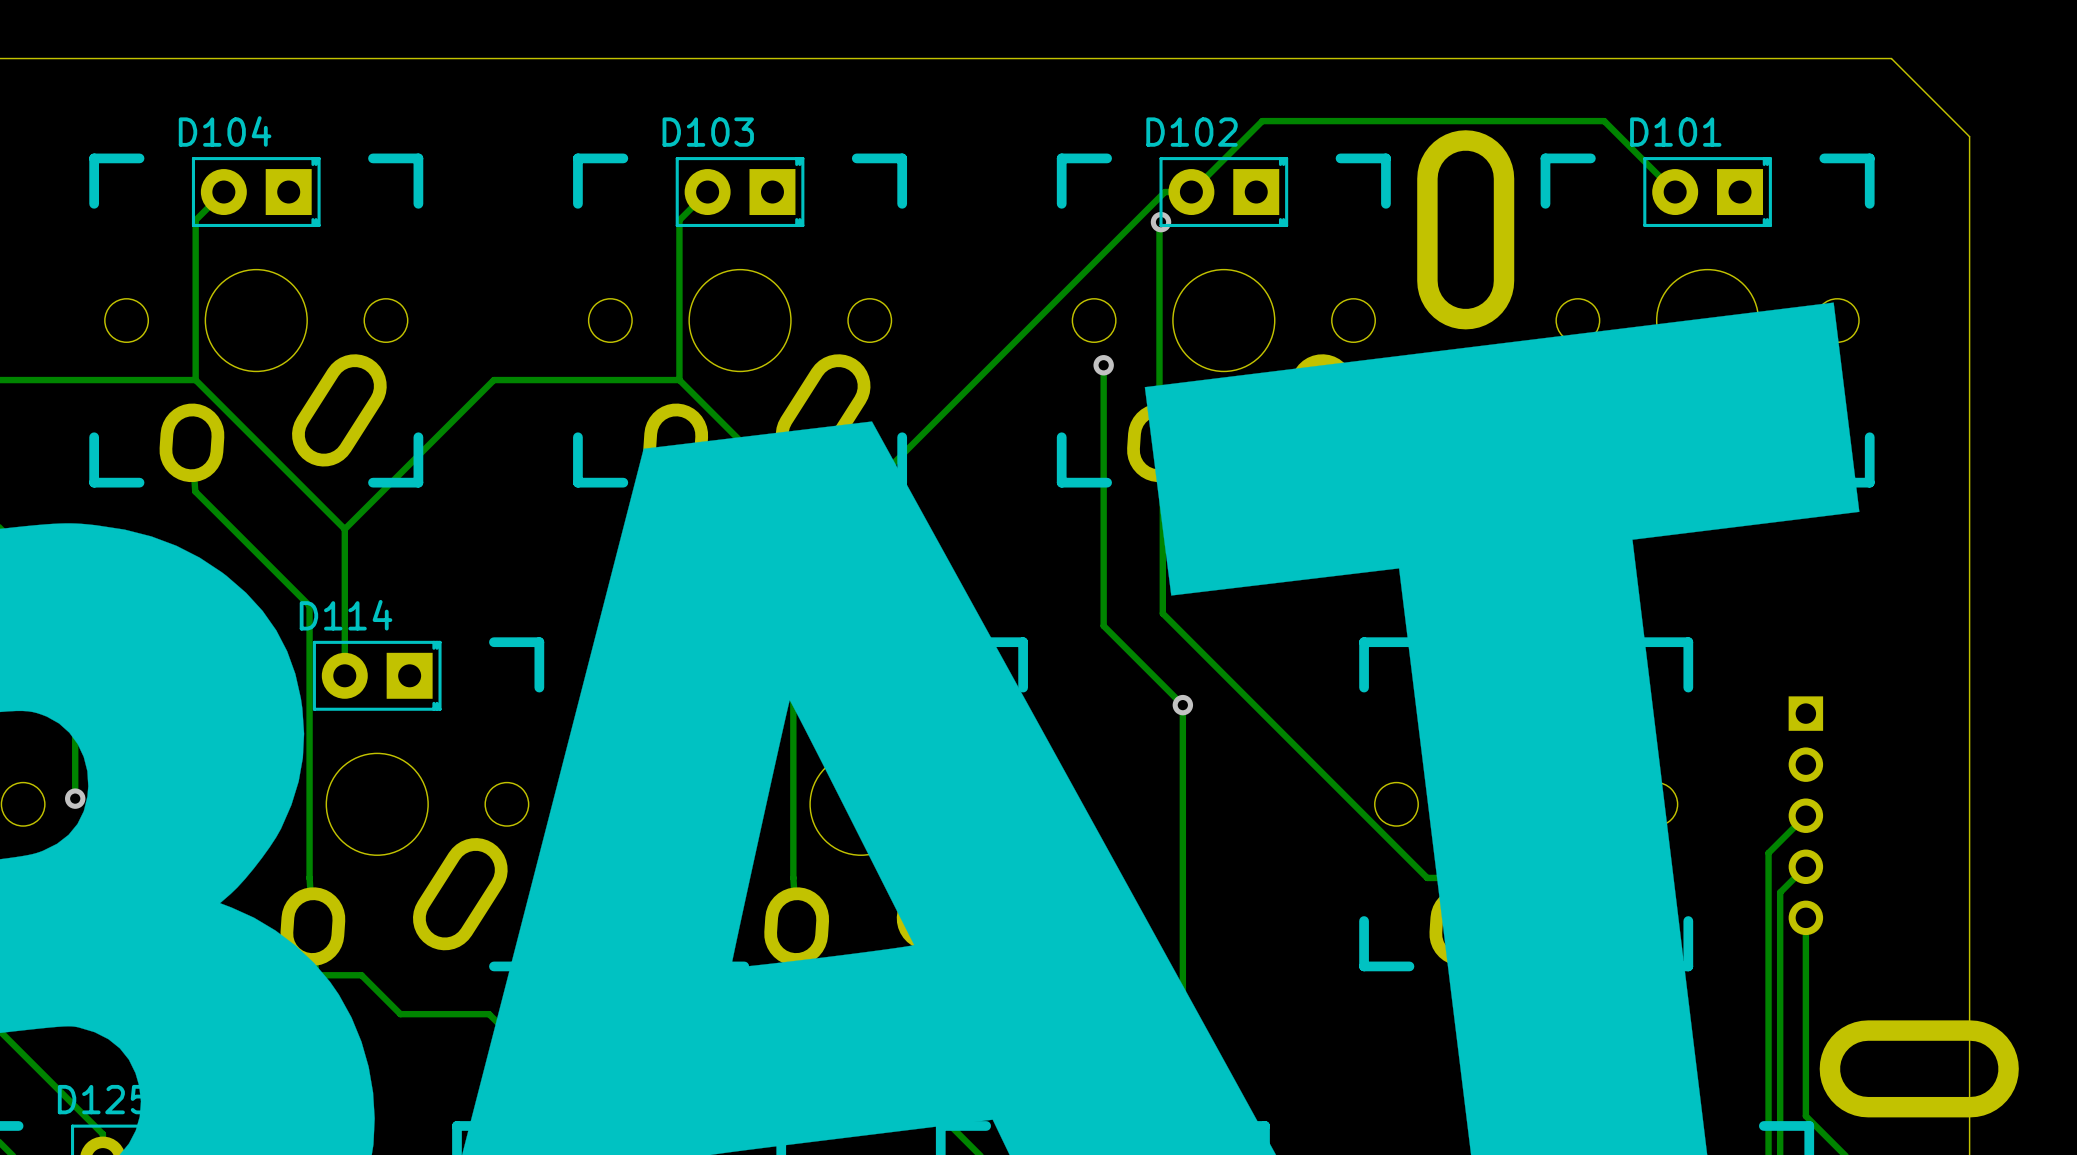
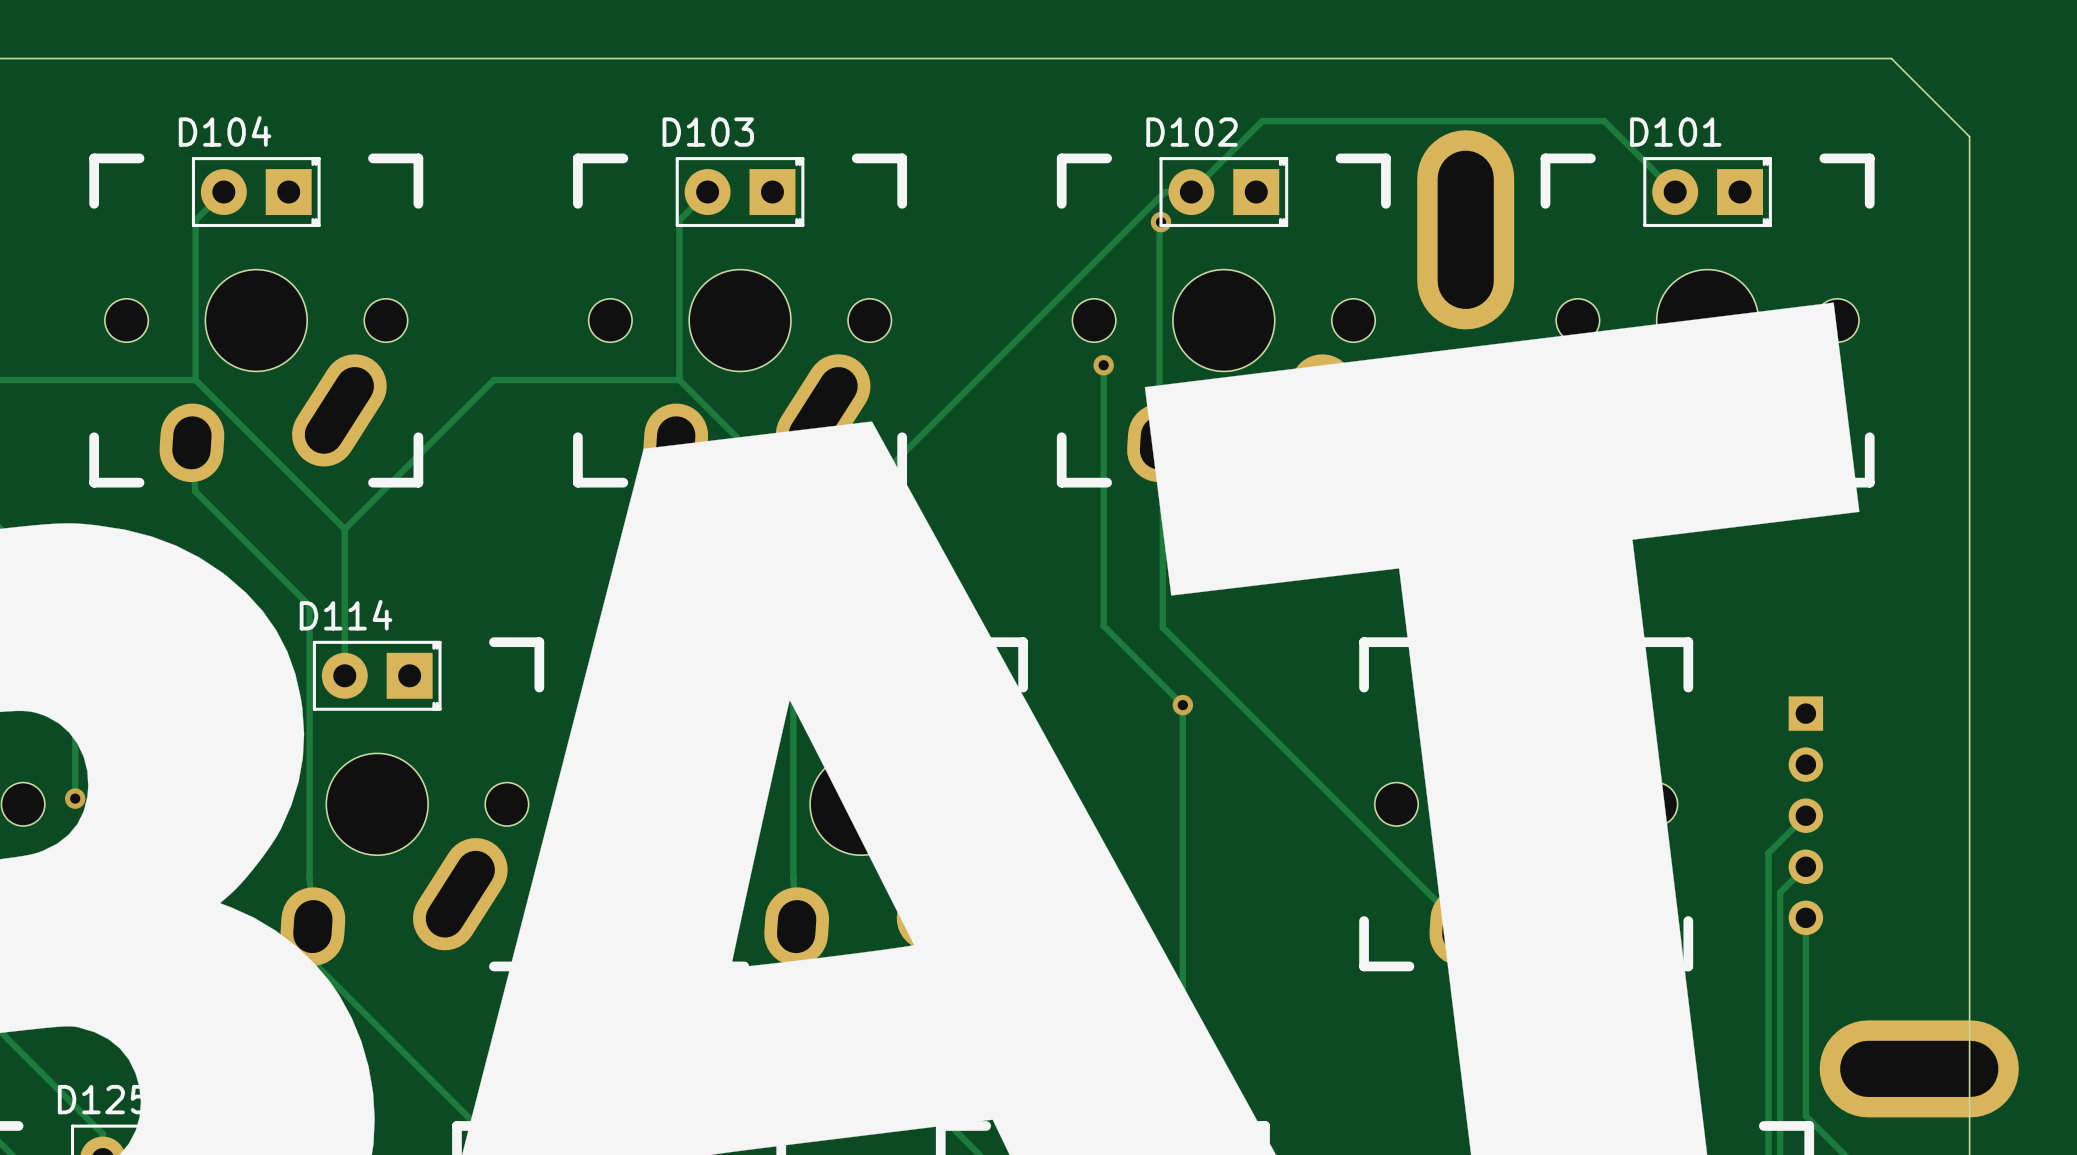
track: (1162, 613) (1427, 877) (1458, 877) (1461, 926) -> (1162, 613) (1162, 627) (1461, 926)
track: (315, 964) (316, 975) (361, 975) (400, 1014) (489, 1014) (602, 1127) -> (315, 964) (478, 1127) (602, 1127)

